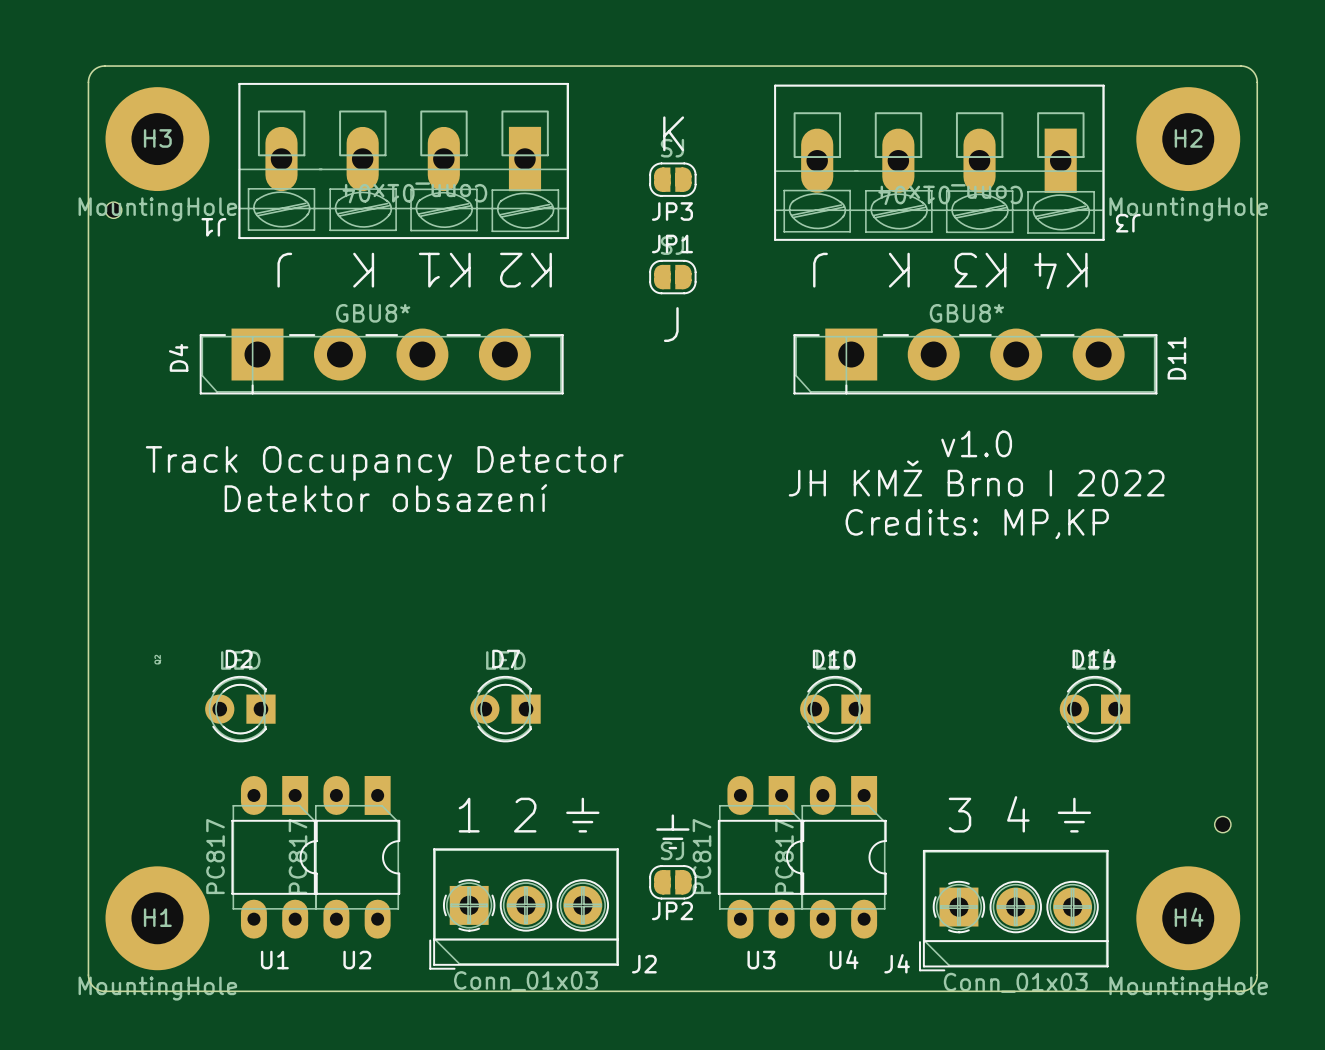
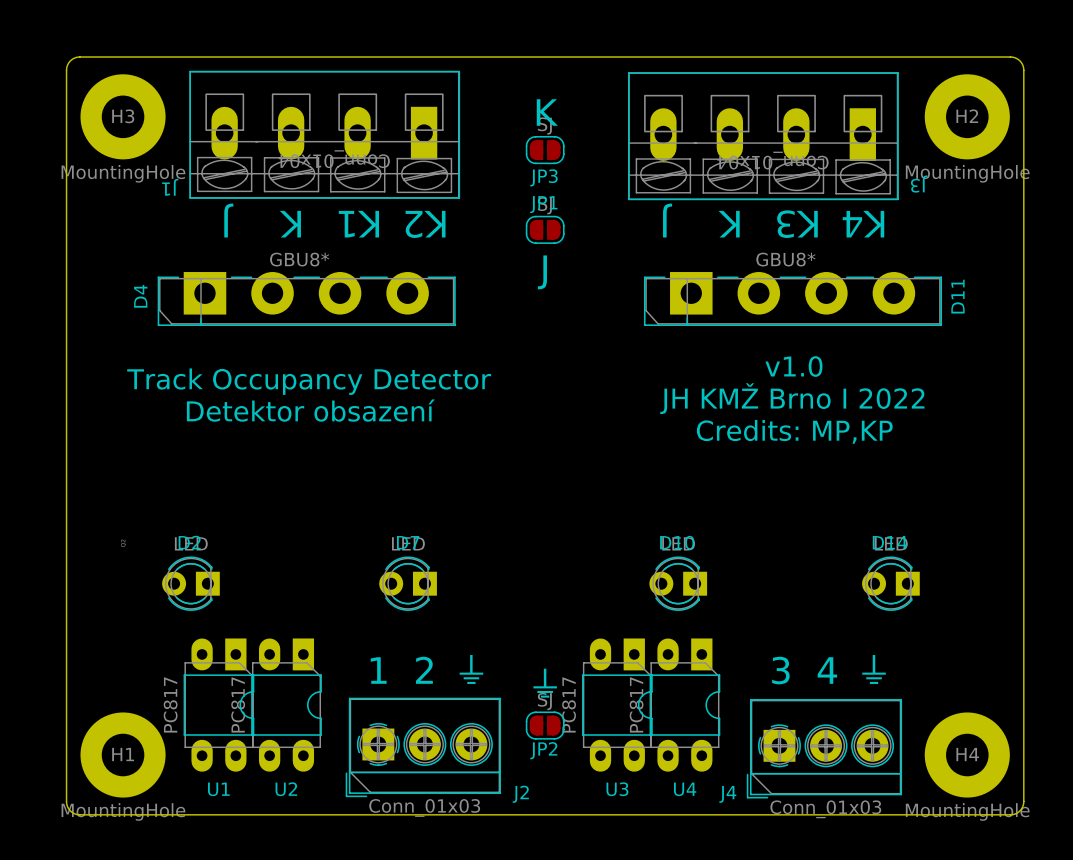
part: (113, 210) -> none
part: (1222, 824) -> none

